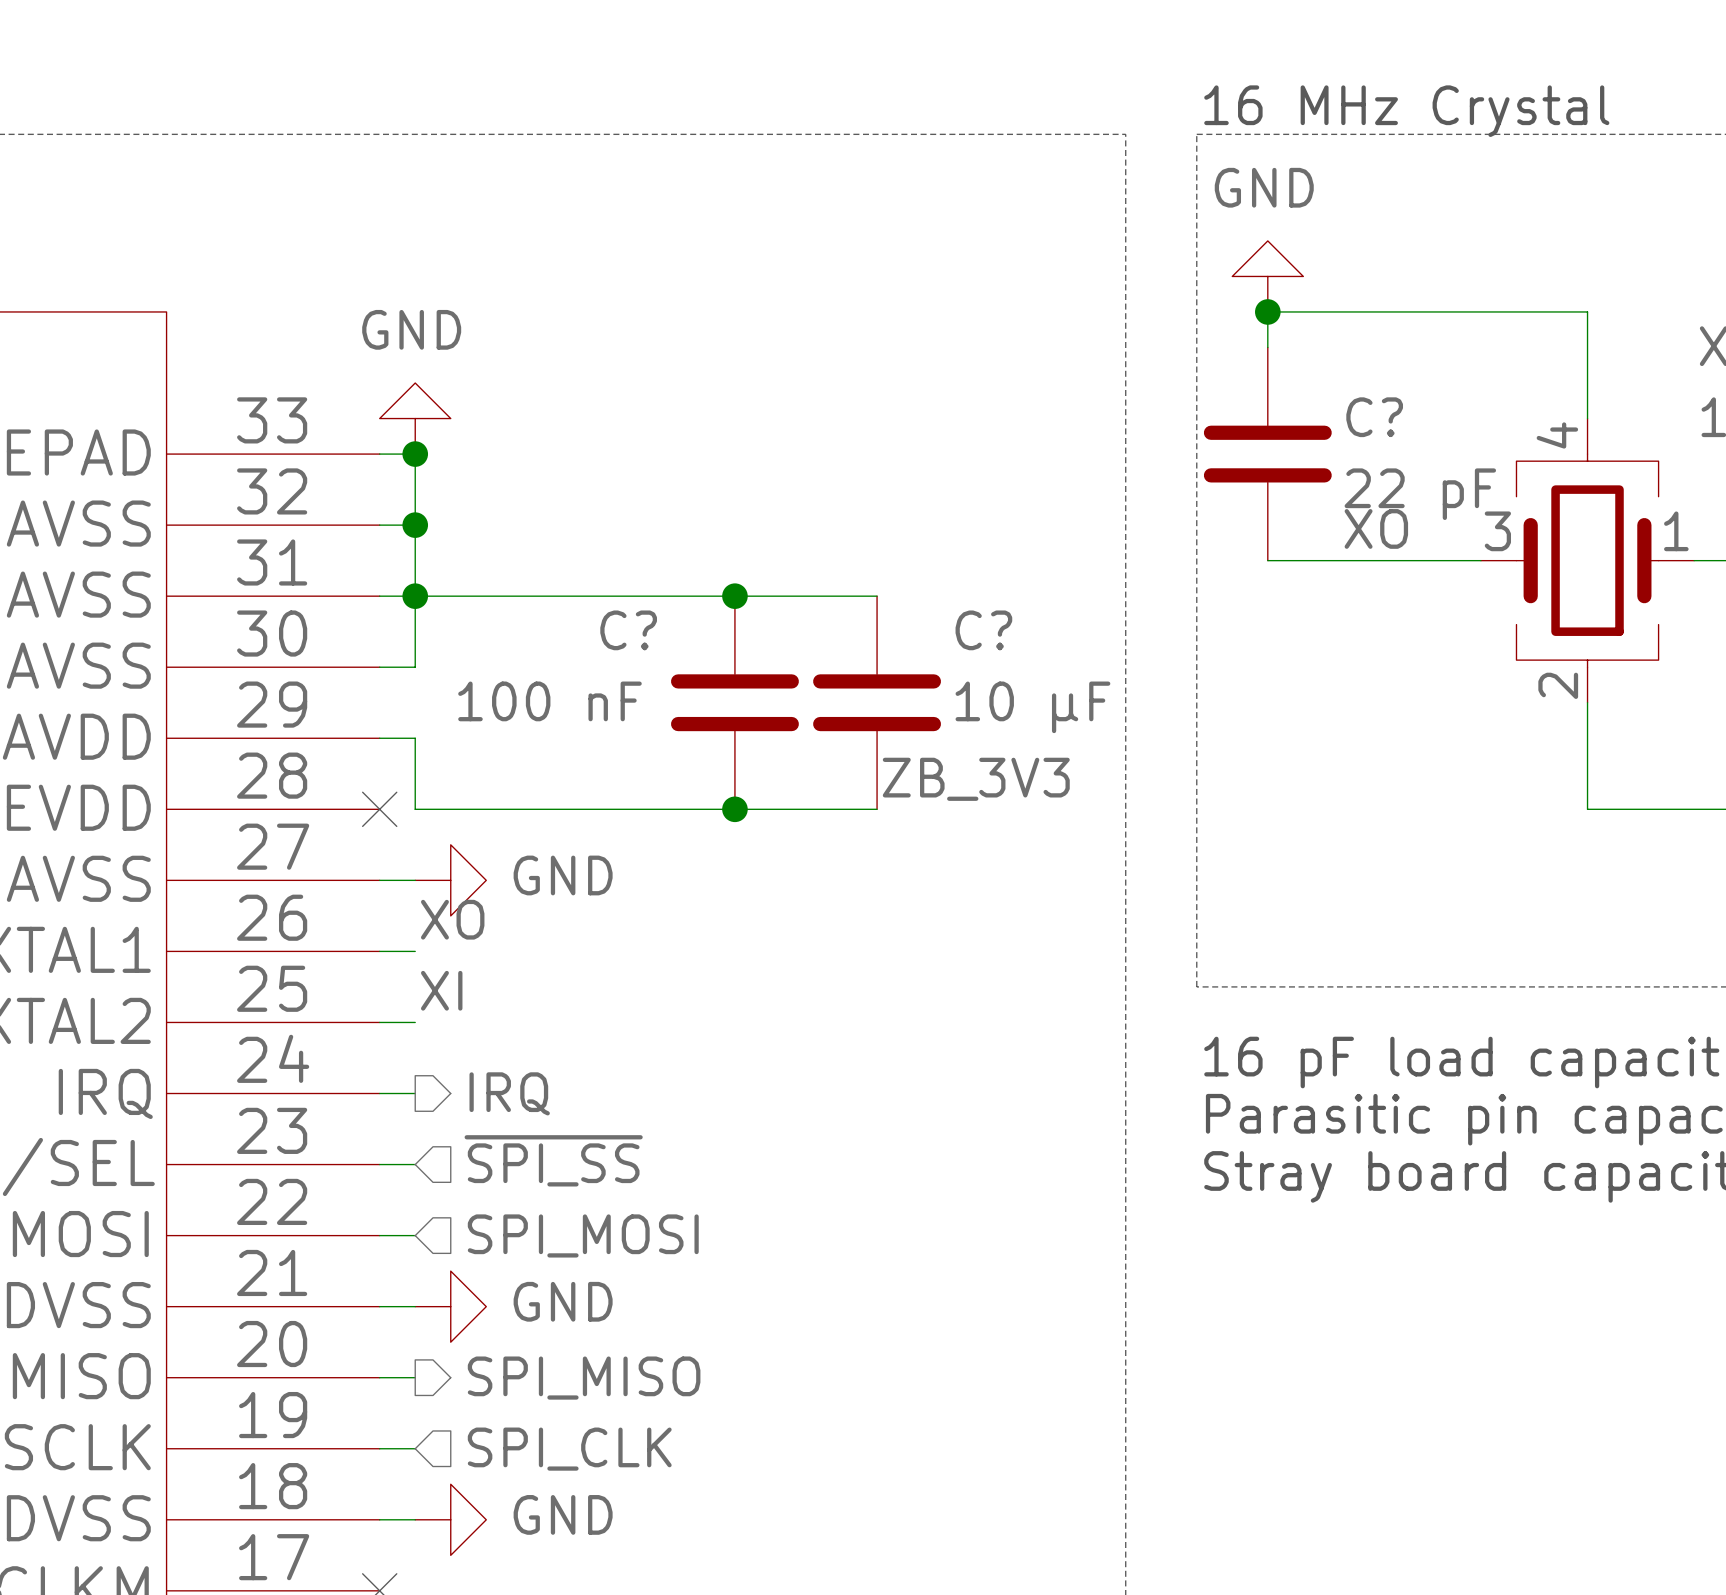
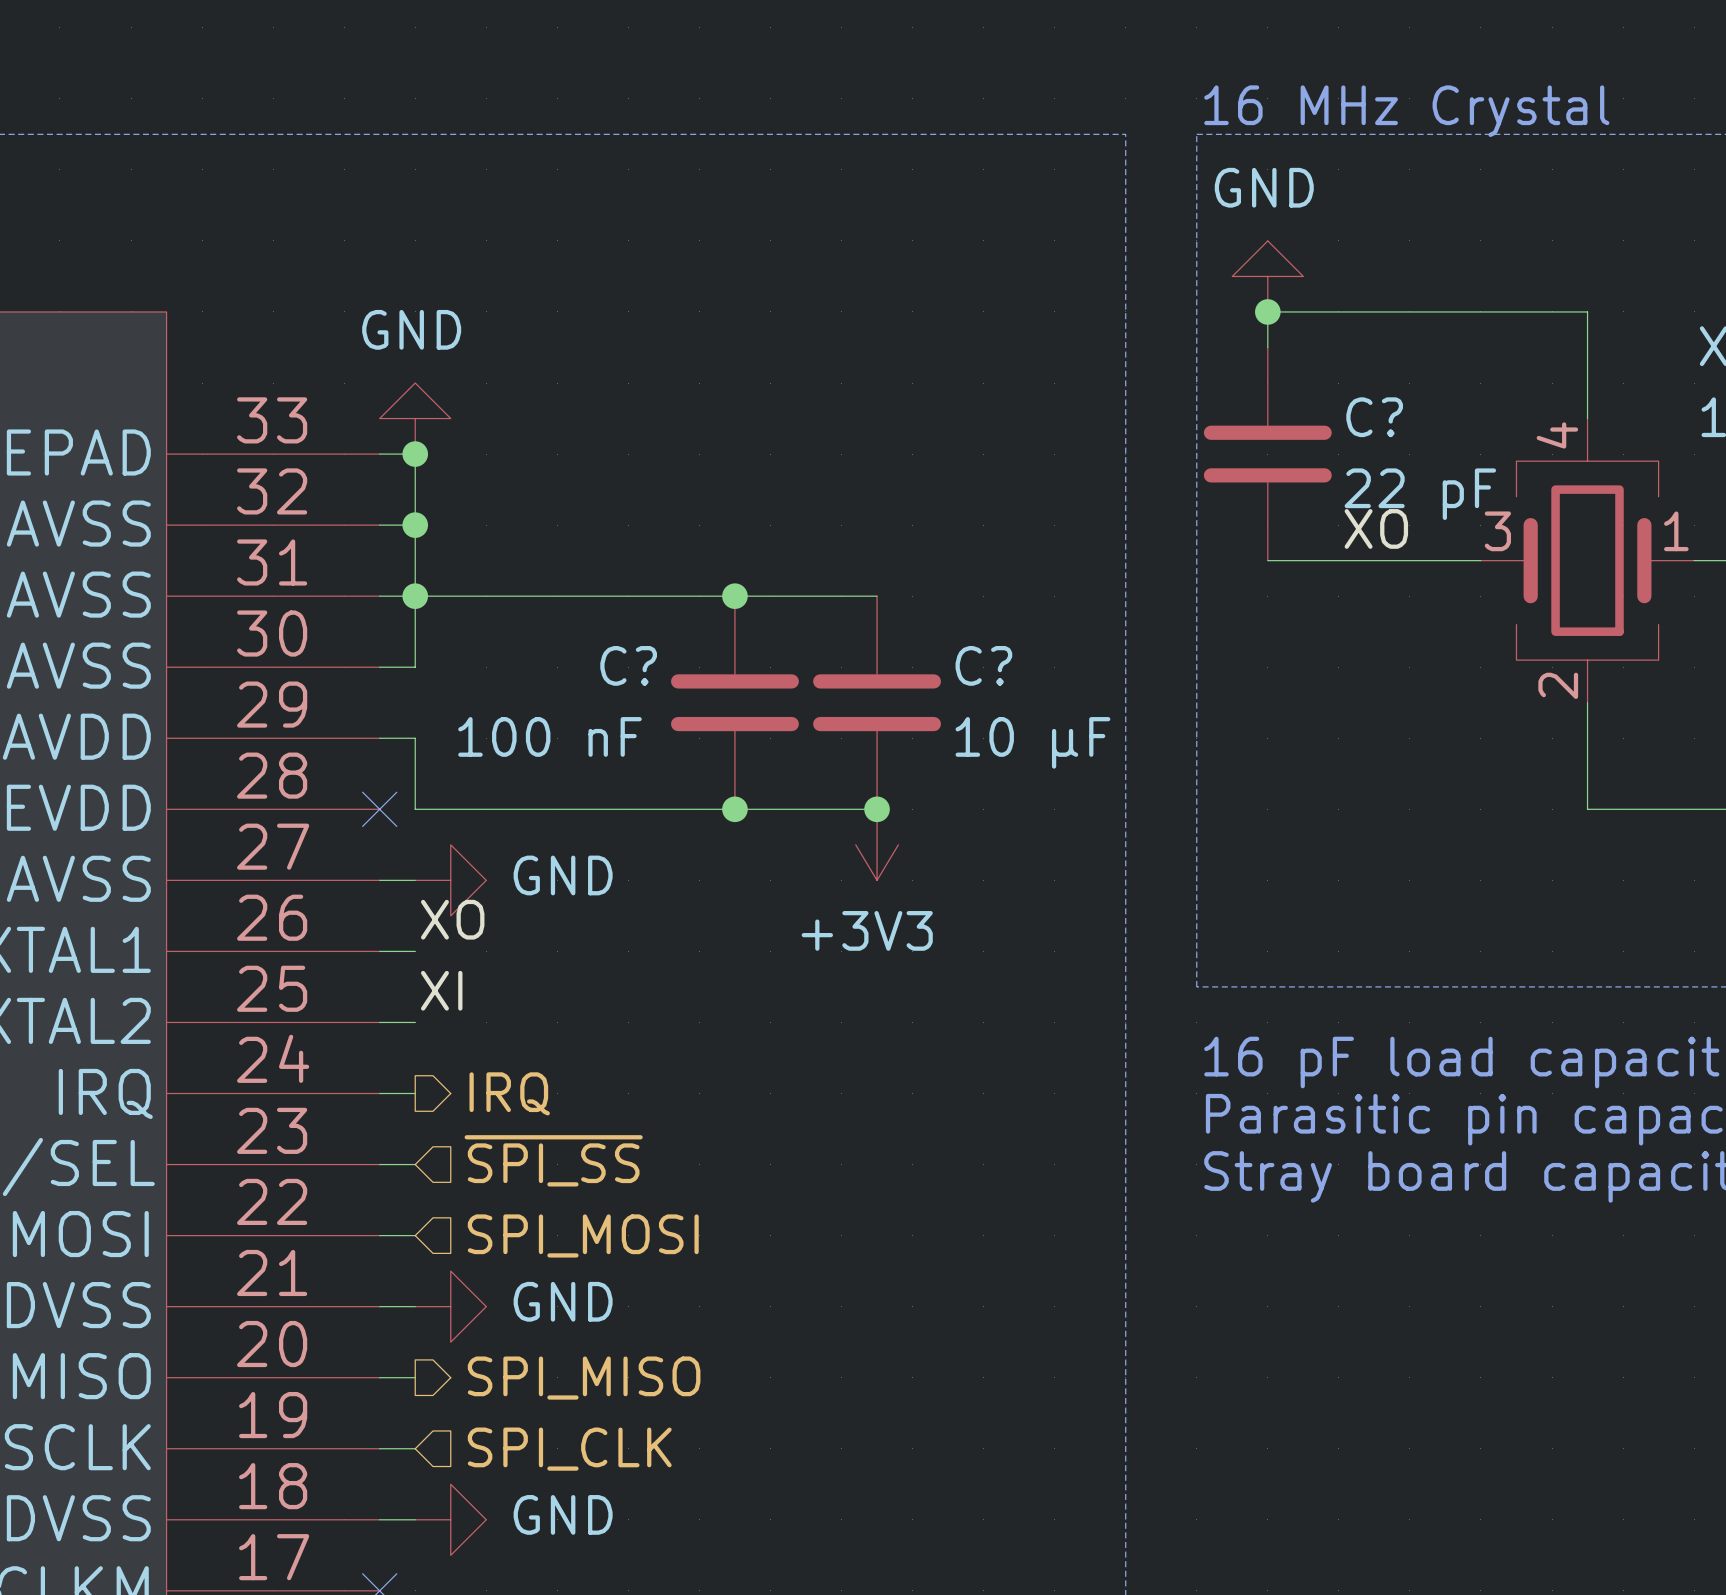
C? name position: C? (628, 630) -> C? (628, 665)
C? name position: C? (983, 630) -> C? (983, 665)
C? value position: 100 nF (549, 701) -> 100 nF (549, 736)
C? value position: 10 µF (1032, 707) -> 10 µF (1032, 742)
label: ZB_3V3 (976, 779) -> none
junction: none -> (877, 809)
power symbol: none -> +3V3 (877, 844)

